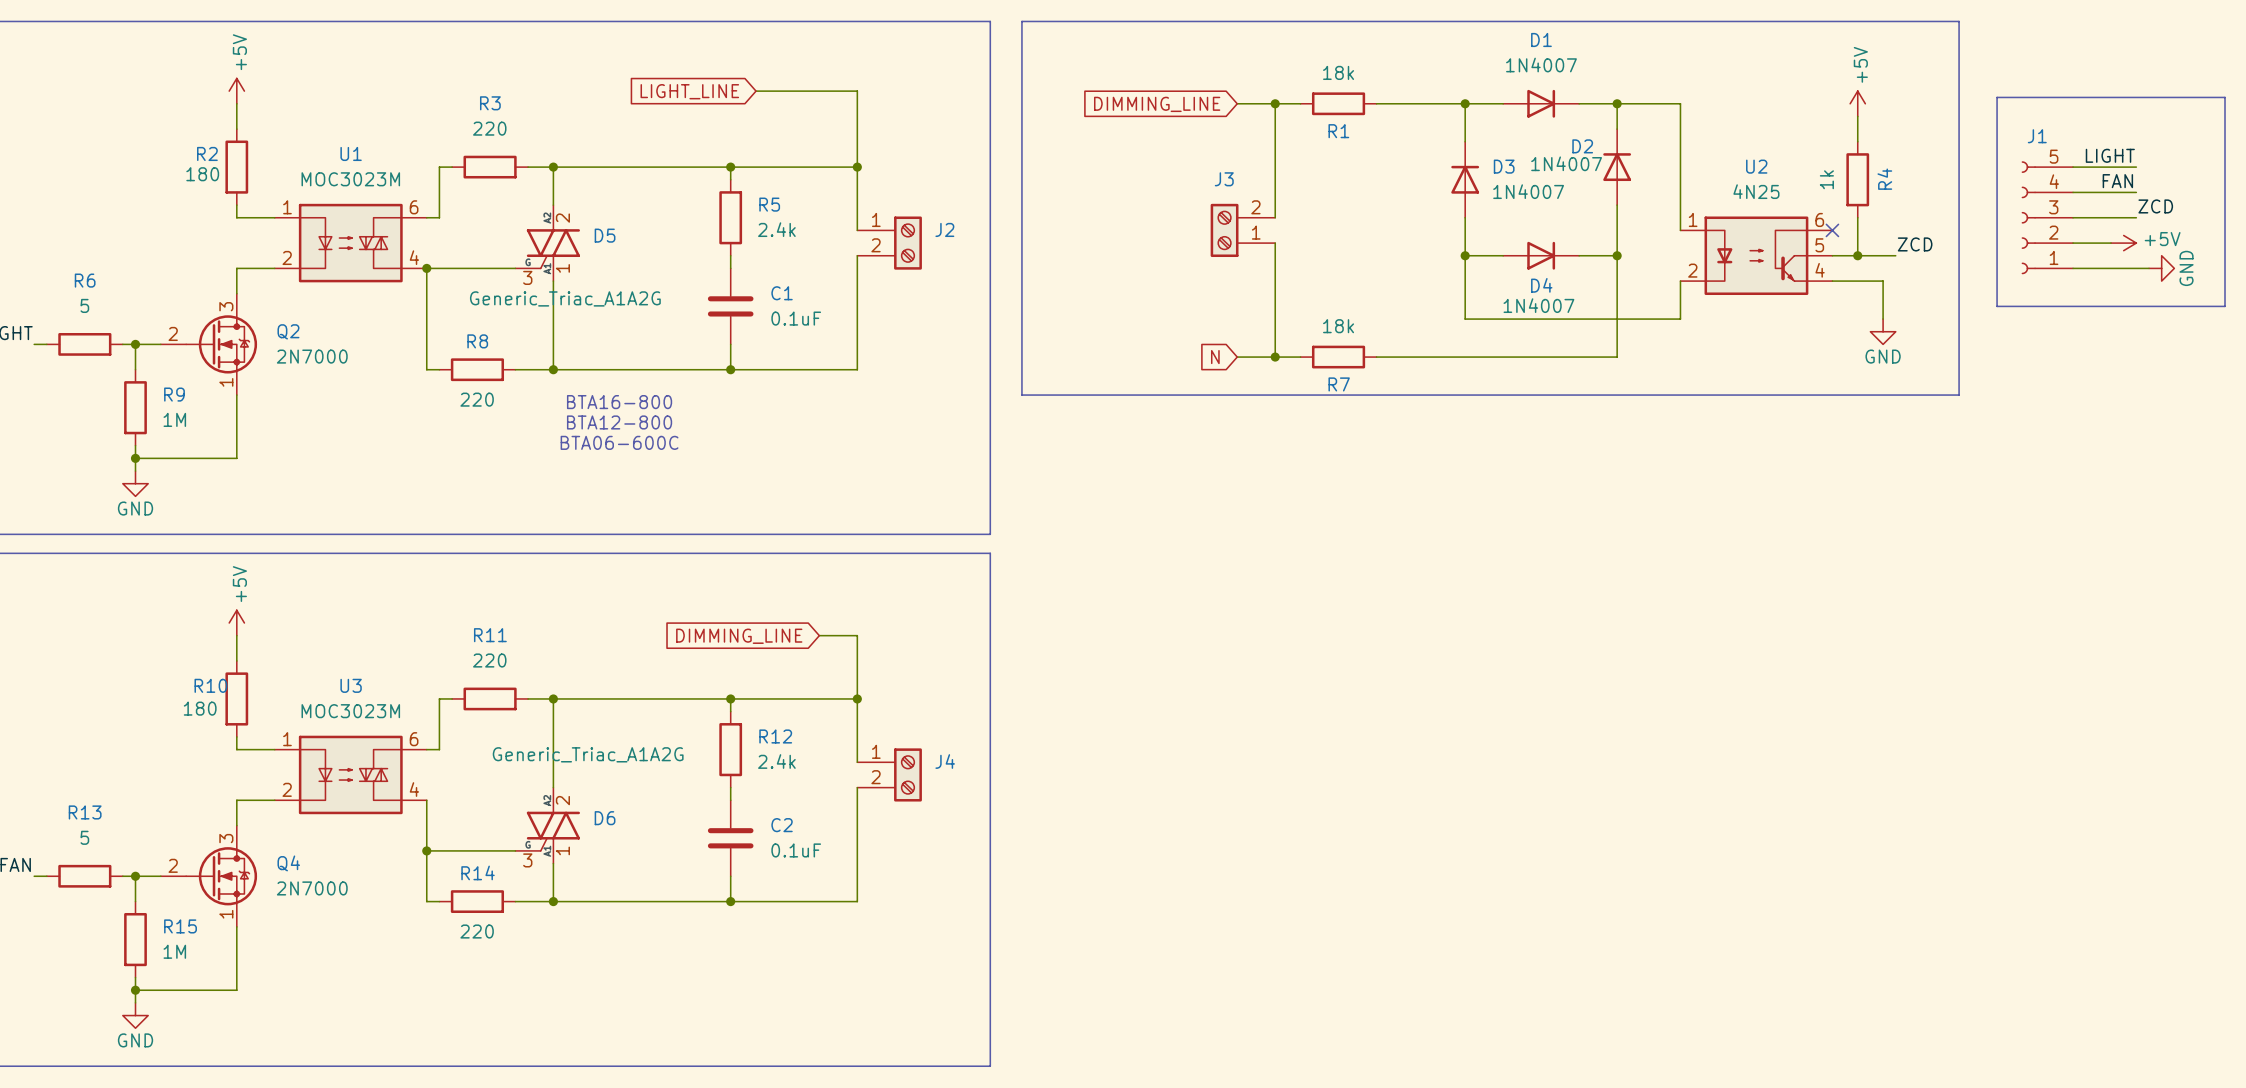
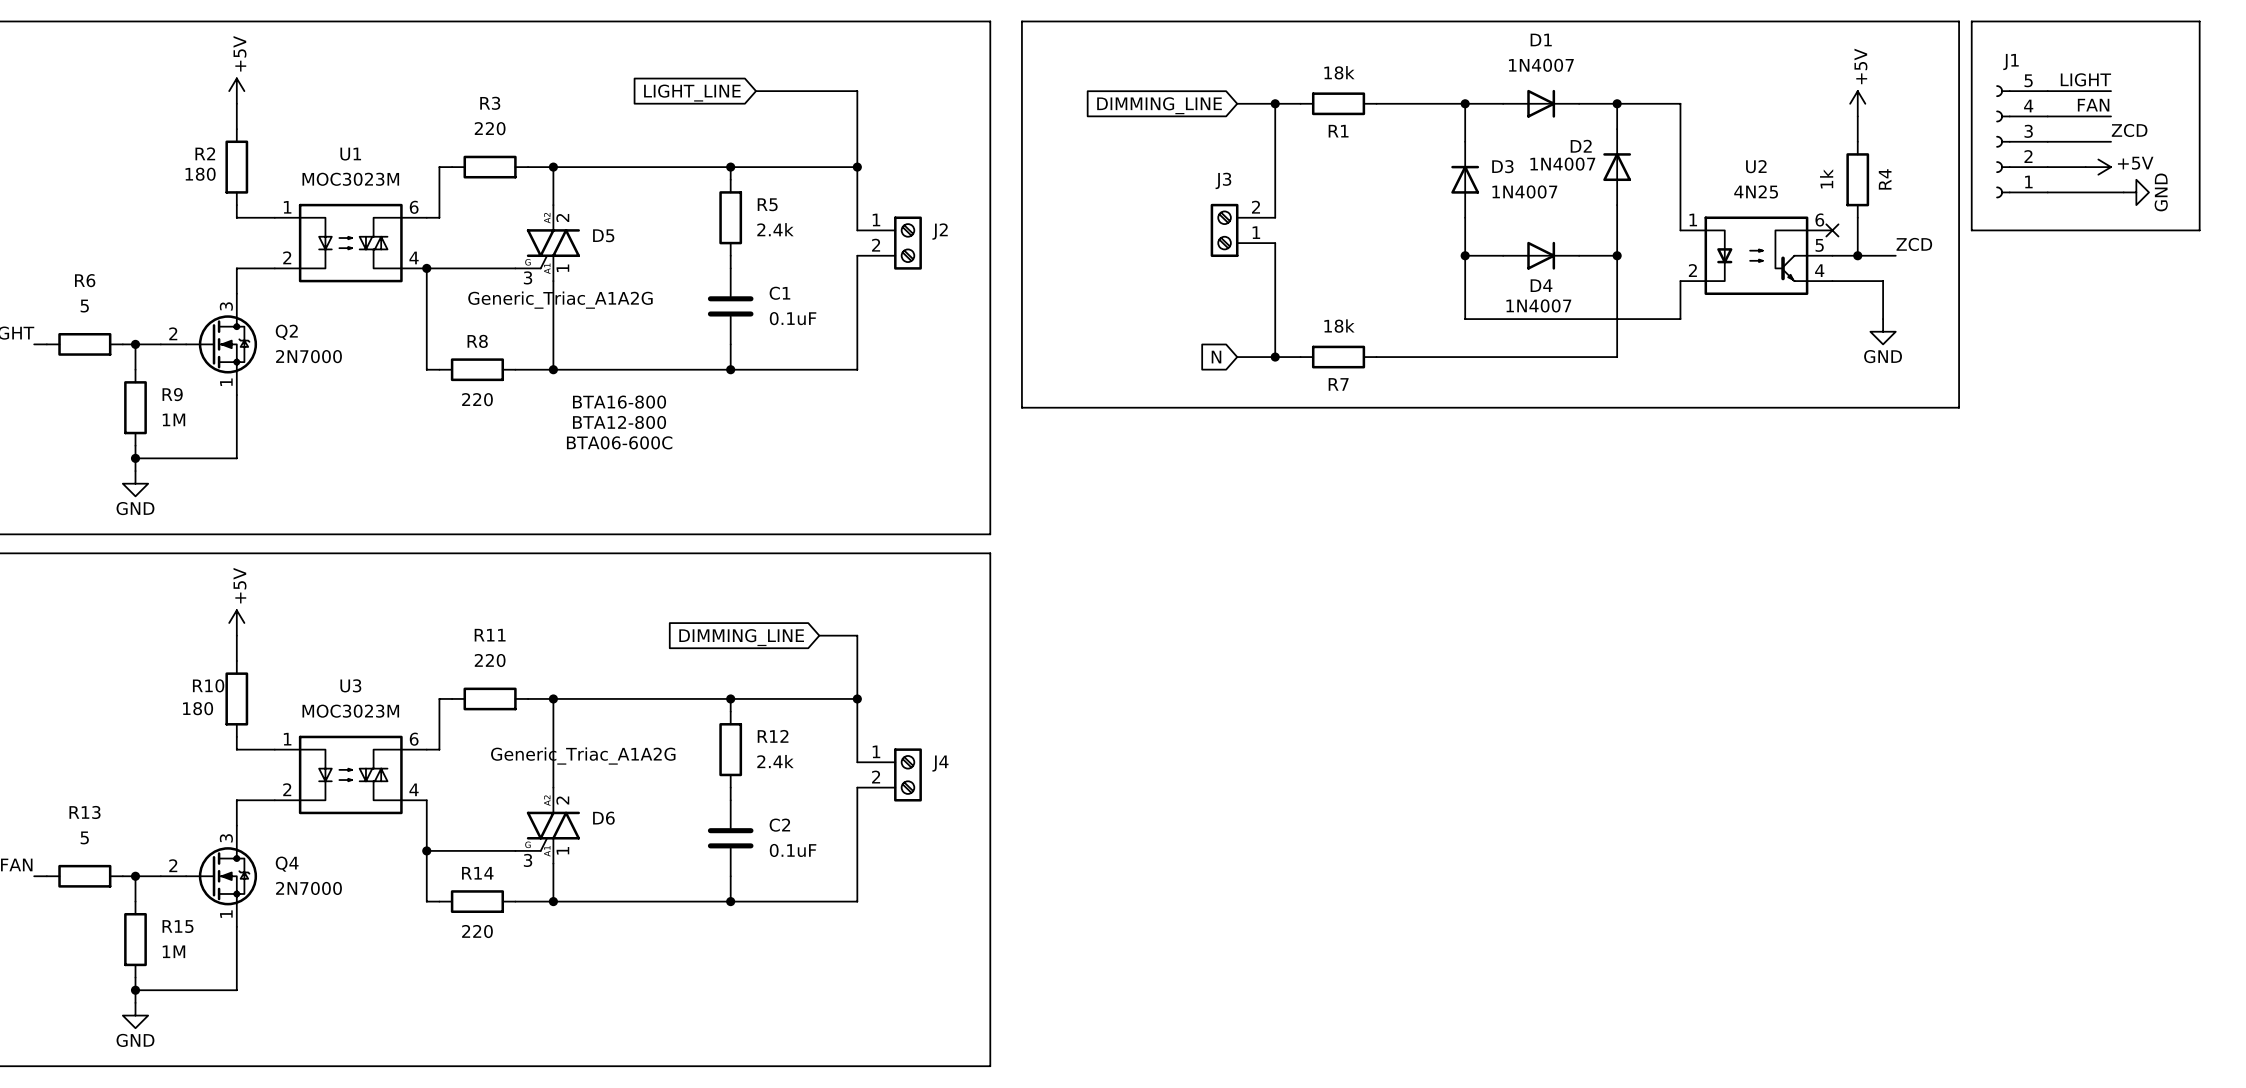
wire: none -> (2047, 91) (2111, 91)
line: (1997, 97) (2225, 97) (2225, 306) (1997, 306) (1997, 97) -> (1971, 21) (2199, 21) (2199, 230) (1971, 230) (1971, 21)
wire: none -> (2047, 116) (2111, 116)
label position: LIGHT (2110, 155) -> LIGHT (2085, 79)
label position: FAN (2117, 181) -> FAN (2093, 105)
label position: ZCD (2155, 206) -> ZCD (2129, 130)
J1 position: (2047, 217) -> (2022, 141)
wire: (2073, 217) (2136, 217) -> (2047, 141) (2111, 141)
wire: (2073, 243) (2111, 243) -> none
power symbol position: +5V (2123, 243) -> +5V (2098, 167)
wire: (2073, 268) (2149, 268) -> none
power symbol position: GND (2161, 268) -> GND (2136, 192)
line: (1021, 395) (1959, 395) -> (1021, 395) (1021, 407) (1959, 407) (1959, 395)

